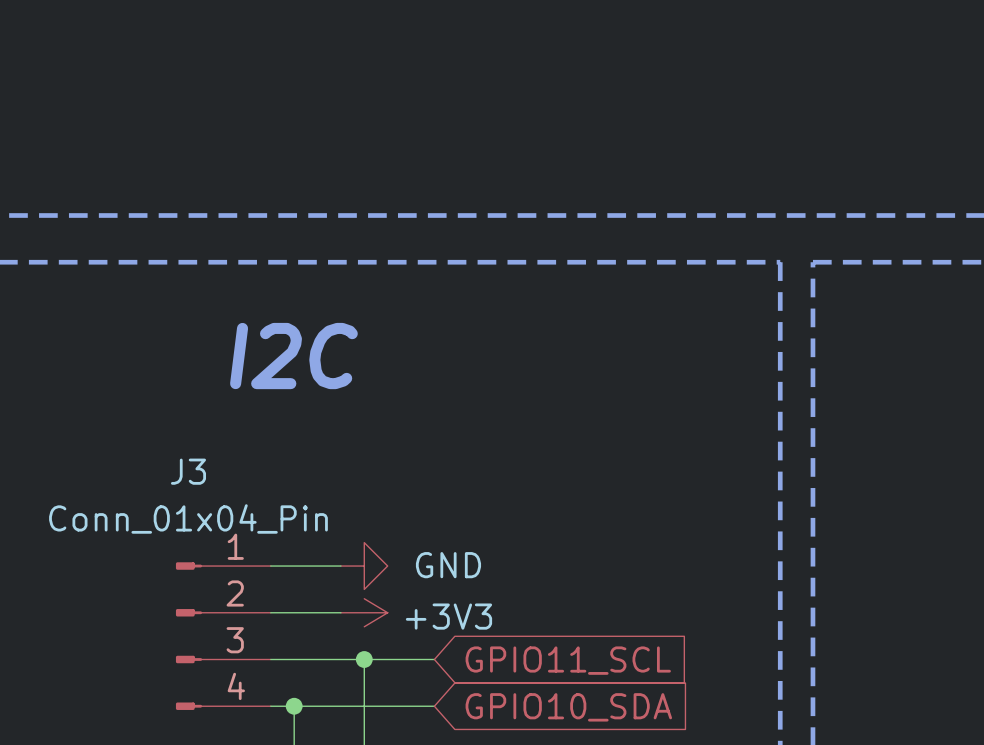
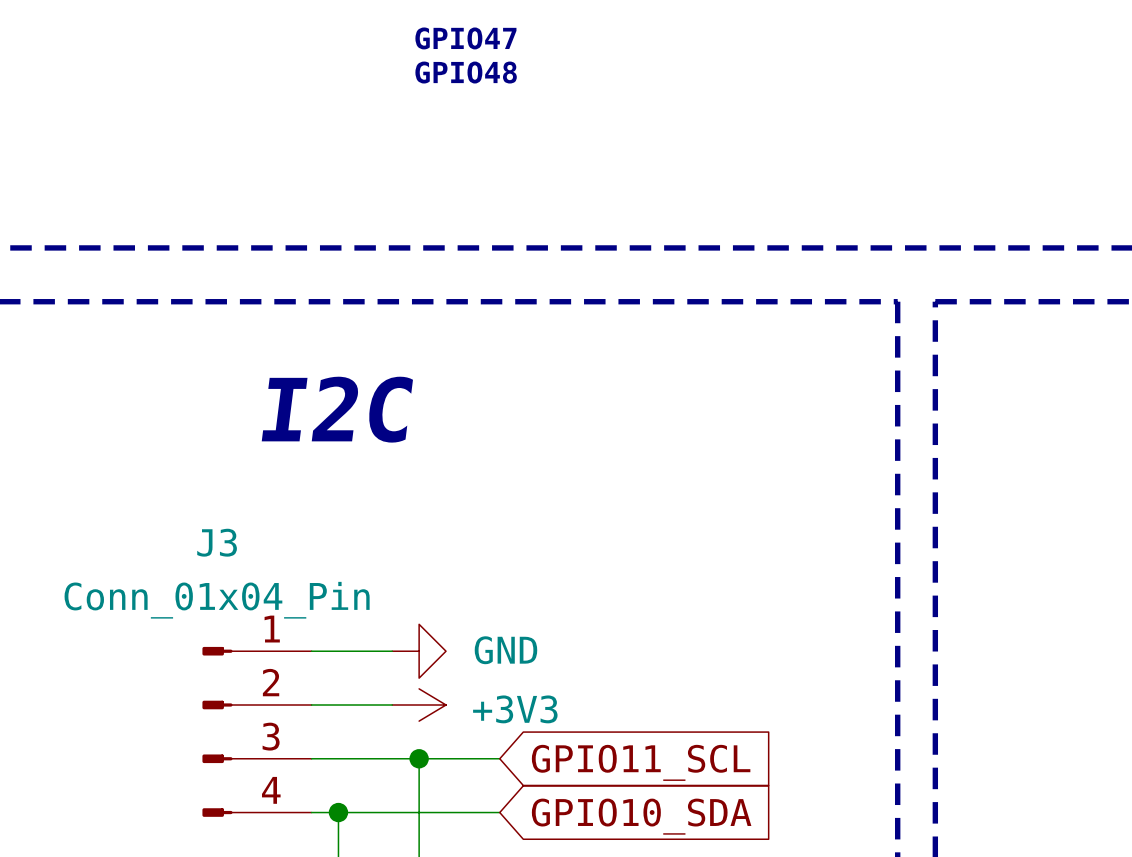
text: none -> GPIO47 (465, 38)
text: none -> GPIO48 (466, 72)

